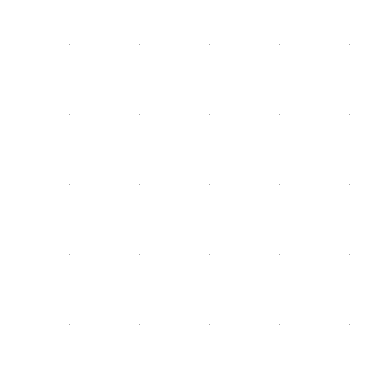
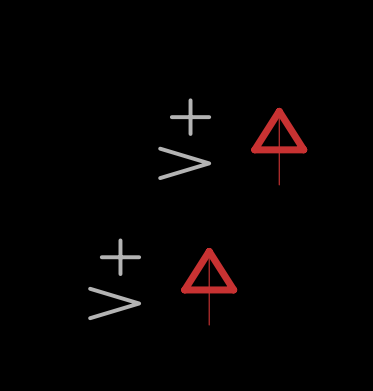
power symbol: none -> V+ (279, 146)
power symbol: none -> V+ (209, 286)

